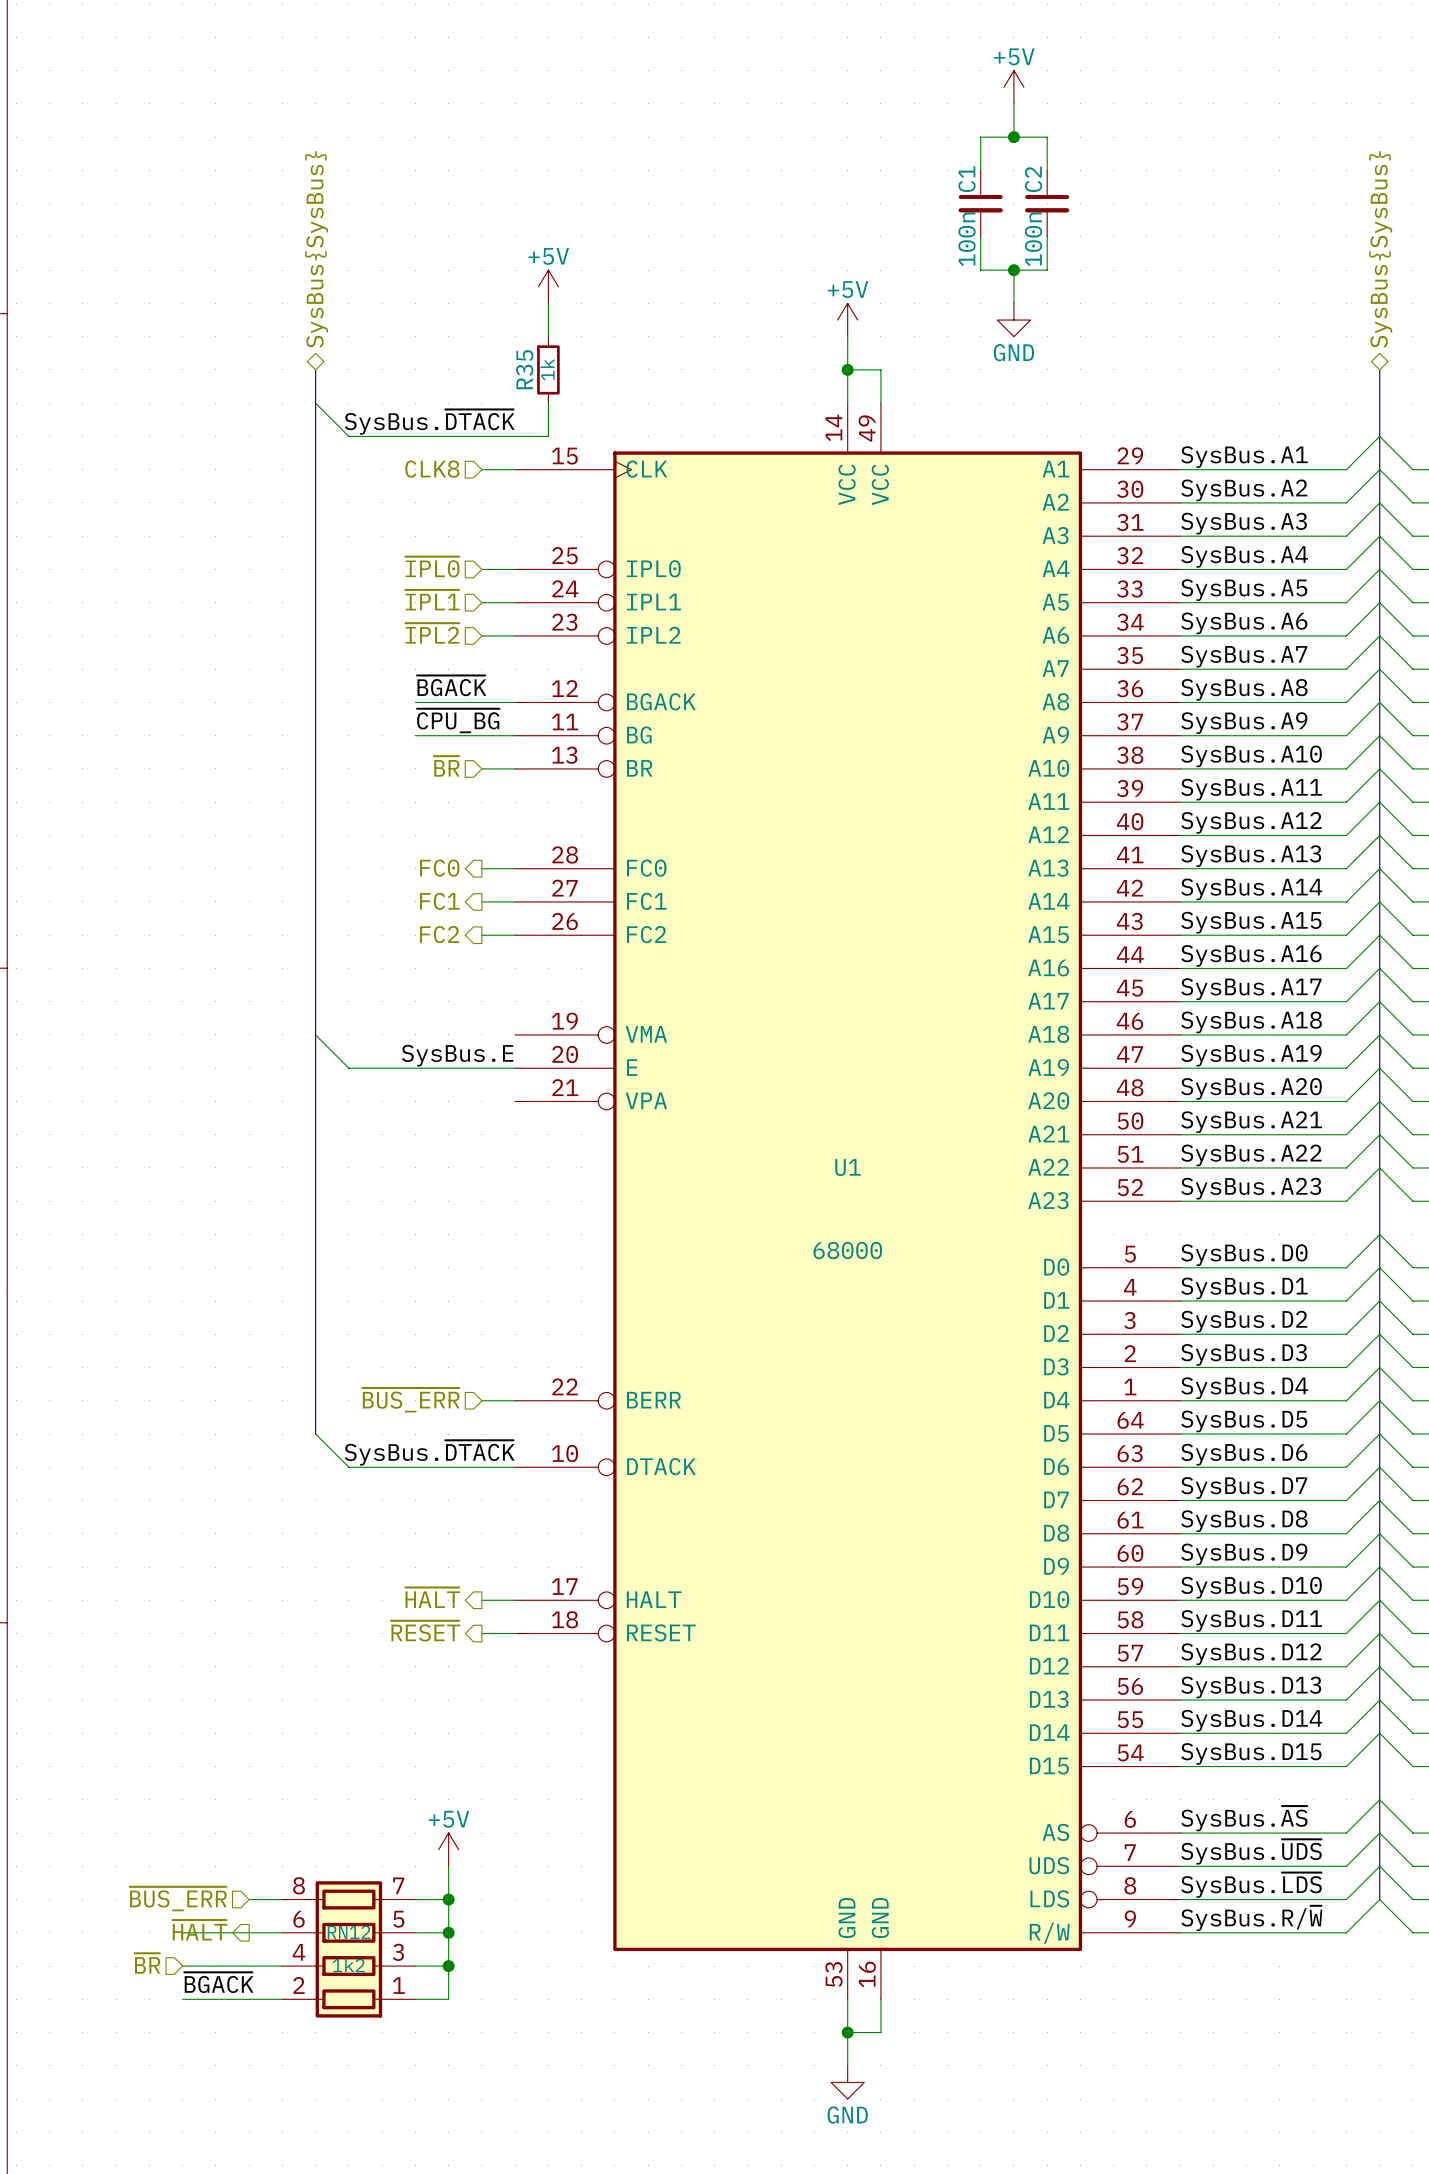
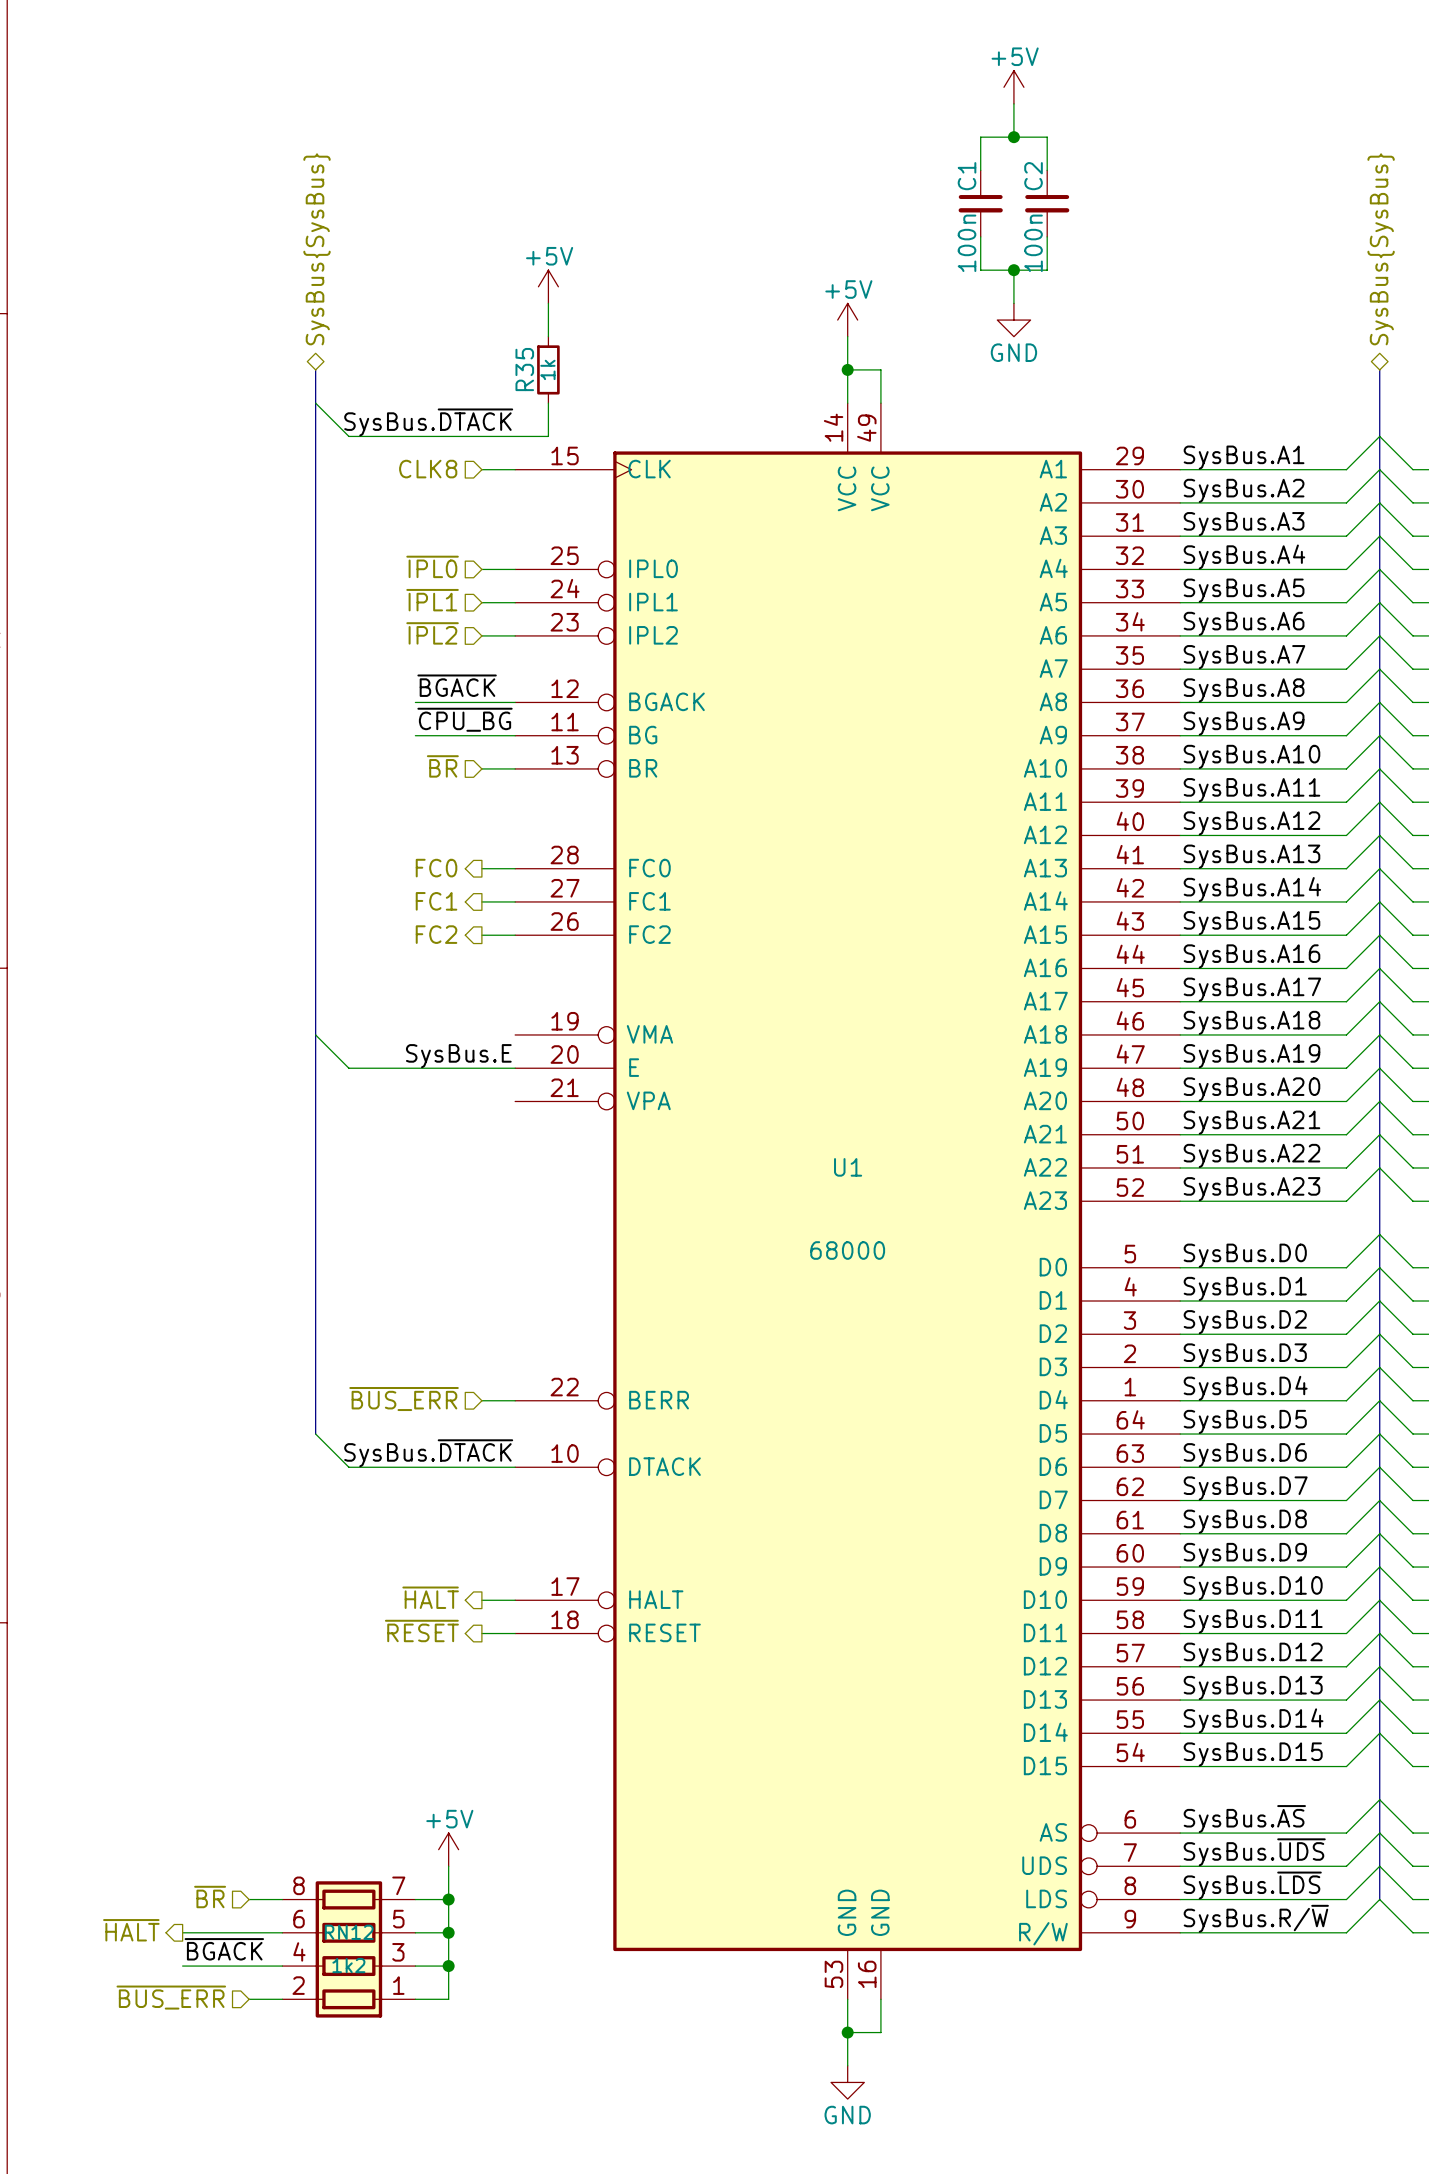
hierarchical label: ~{BUS_ERR} (178, 1899) -> ~{BR} (210, 1897)
hierarchical label position: ~{HALT} (199, 1930) -> ~{HALT} (131, 1930)
hierarchical label: ~{BR} (147, 1963) -> ~{BUS_ERR} (171, 1997)
label position: ~{BGACK} (218, 1982) -> ~{BGACK} (224, 1949)
wire: (182, 1999) (249, 1999) -> none

